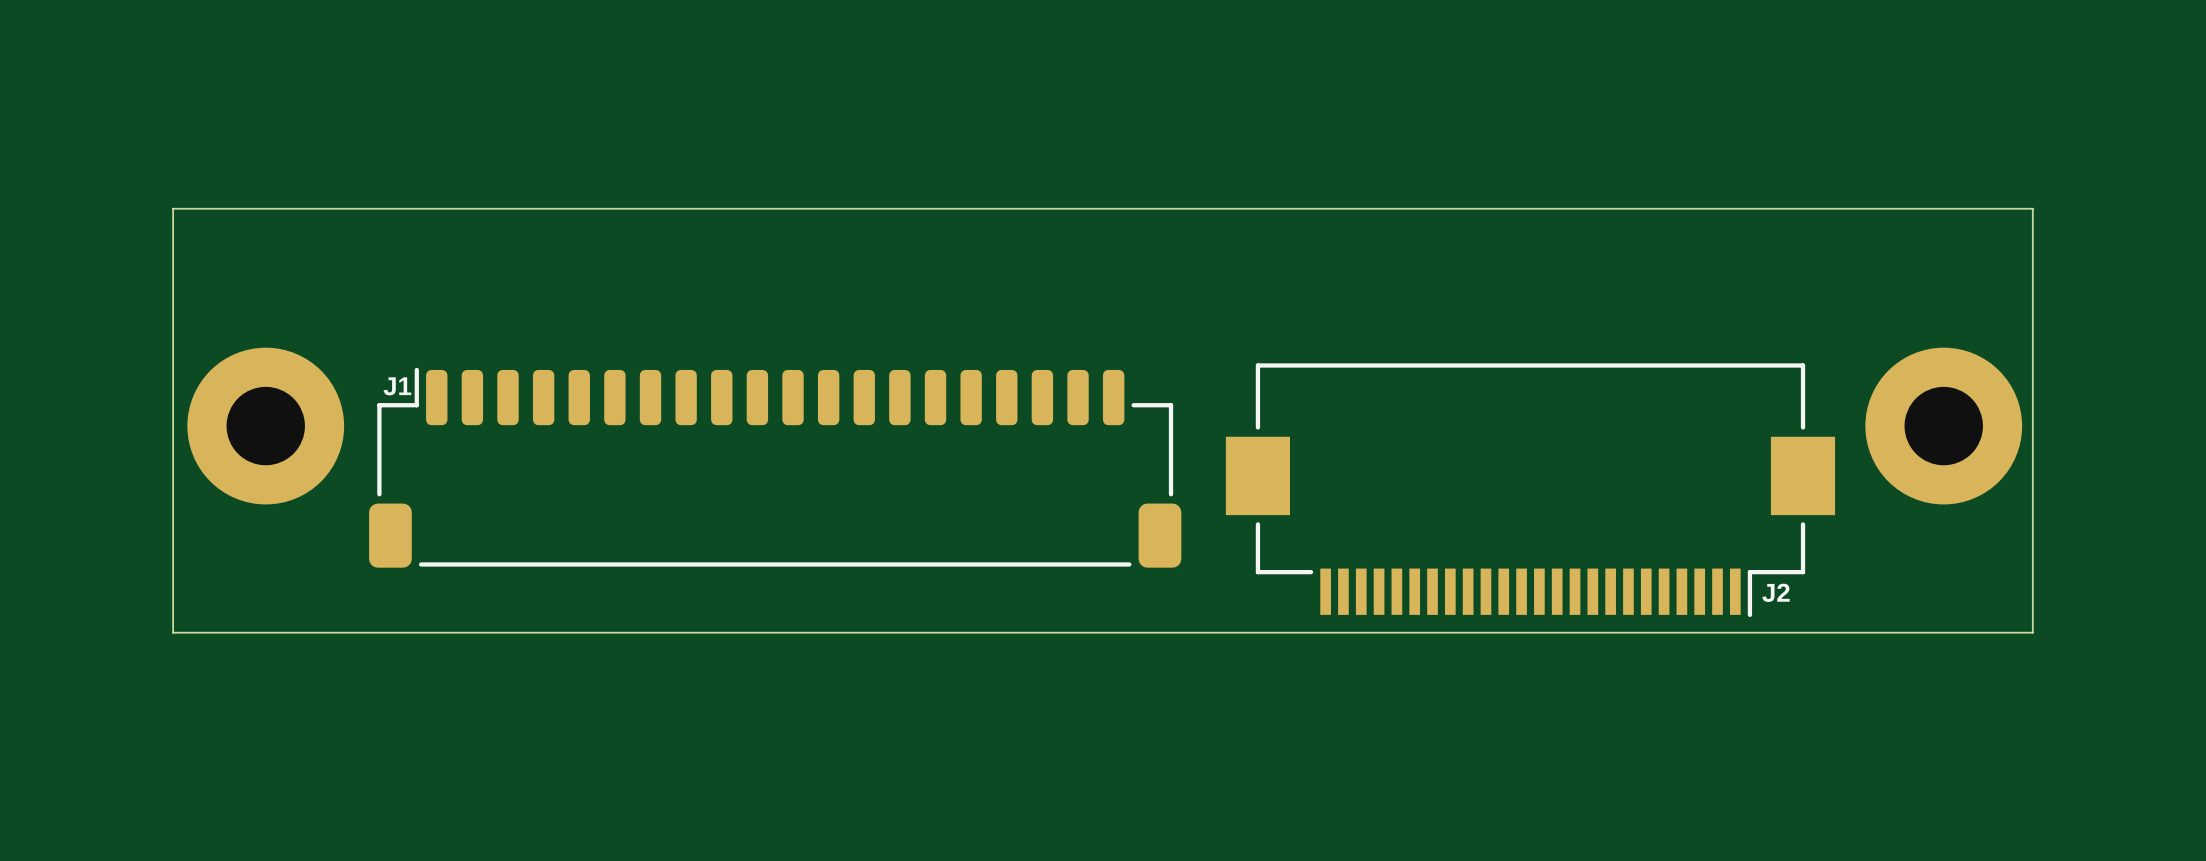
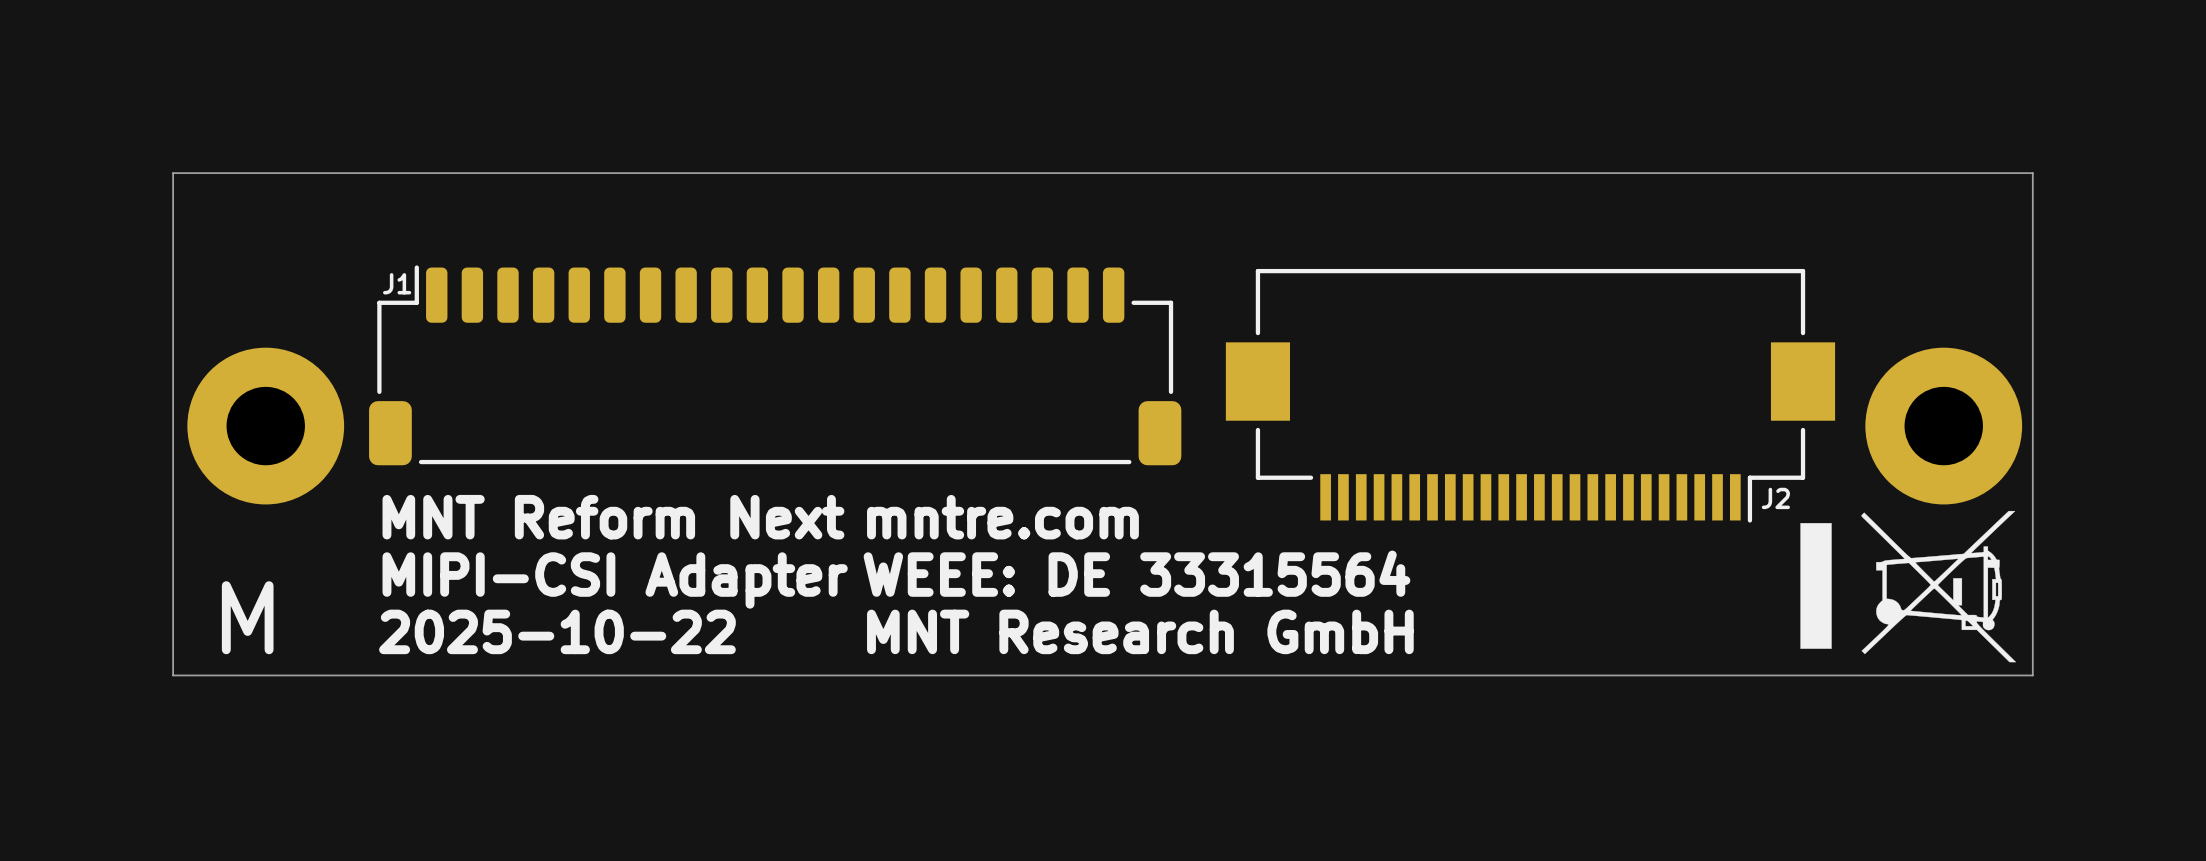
board edge: (173, 208) (2032, 208) -> (173, 208) (173, 173) (2032, 173) (2032, 208)
J1 position: (775, 467) -> (775, 365)
J2 position: (1530, 490) -> (1530, 395)
drawing: none -> [1800, 510, 2016, 663]
text: none -> MNT Reform Next (613, 517)
text: none -> mntre.com (1002, 517)
text: none -> WEEE: DE 33315564 (1136, 573)
text: none -> MIPI-CSI Adapter (615, 580)
text: none -> M (247, 617)
text: none -> 2025-10-22 (557, 631)
text: none -> MNT Research GmbH (1140, 631)
board edge: (173, 632) (2032, 632) -> (173, 632) (173, 675) (2032, 675) (2032, 632)

